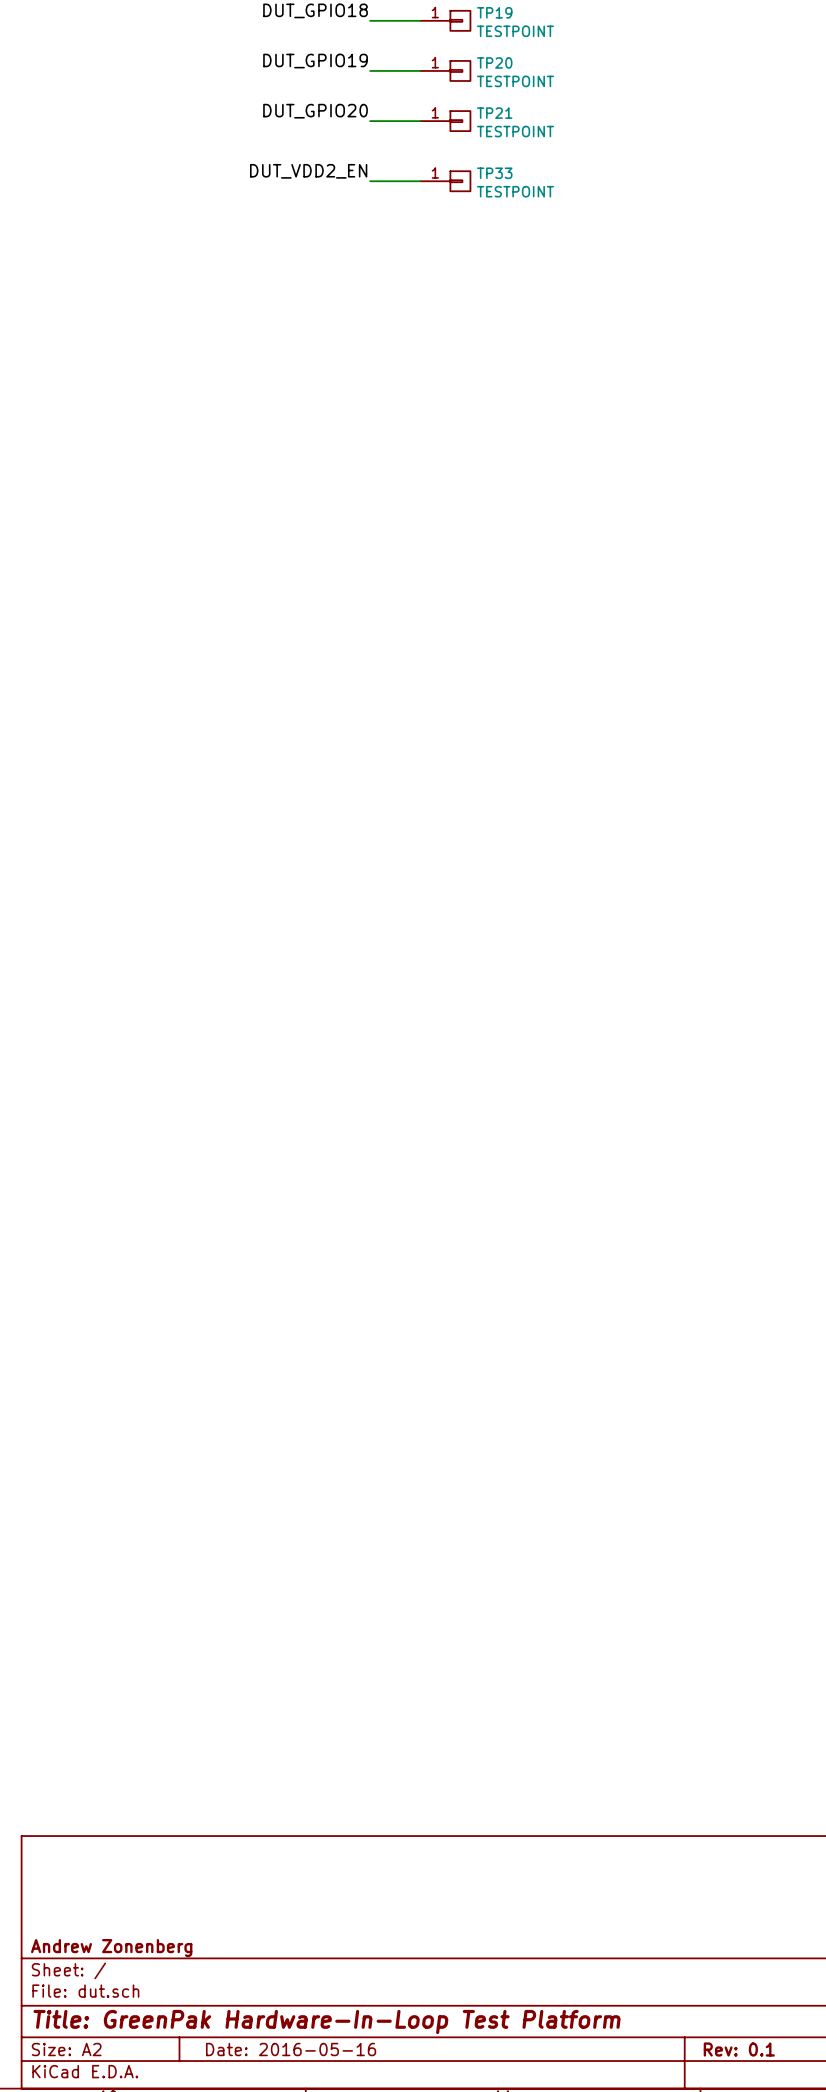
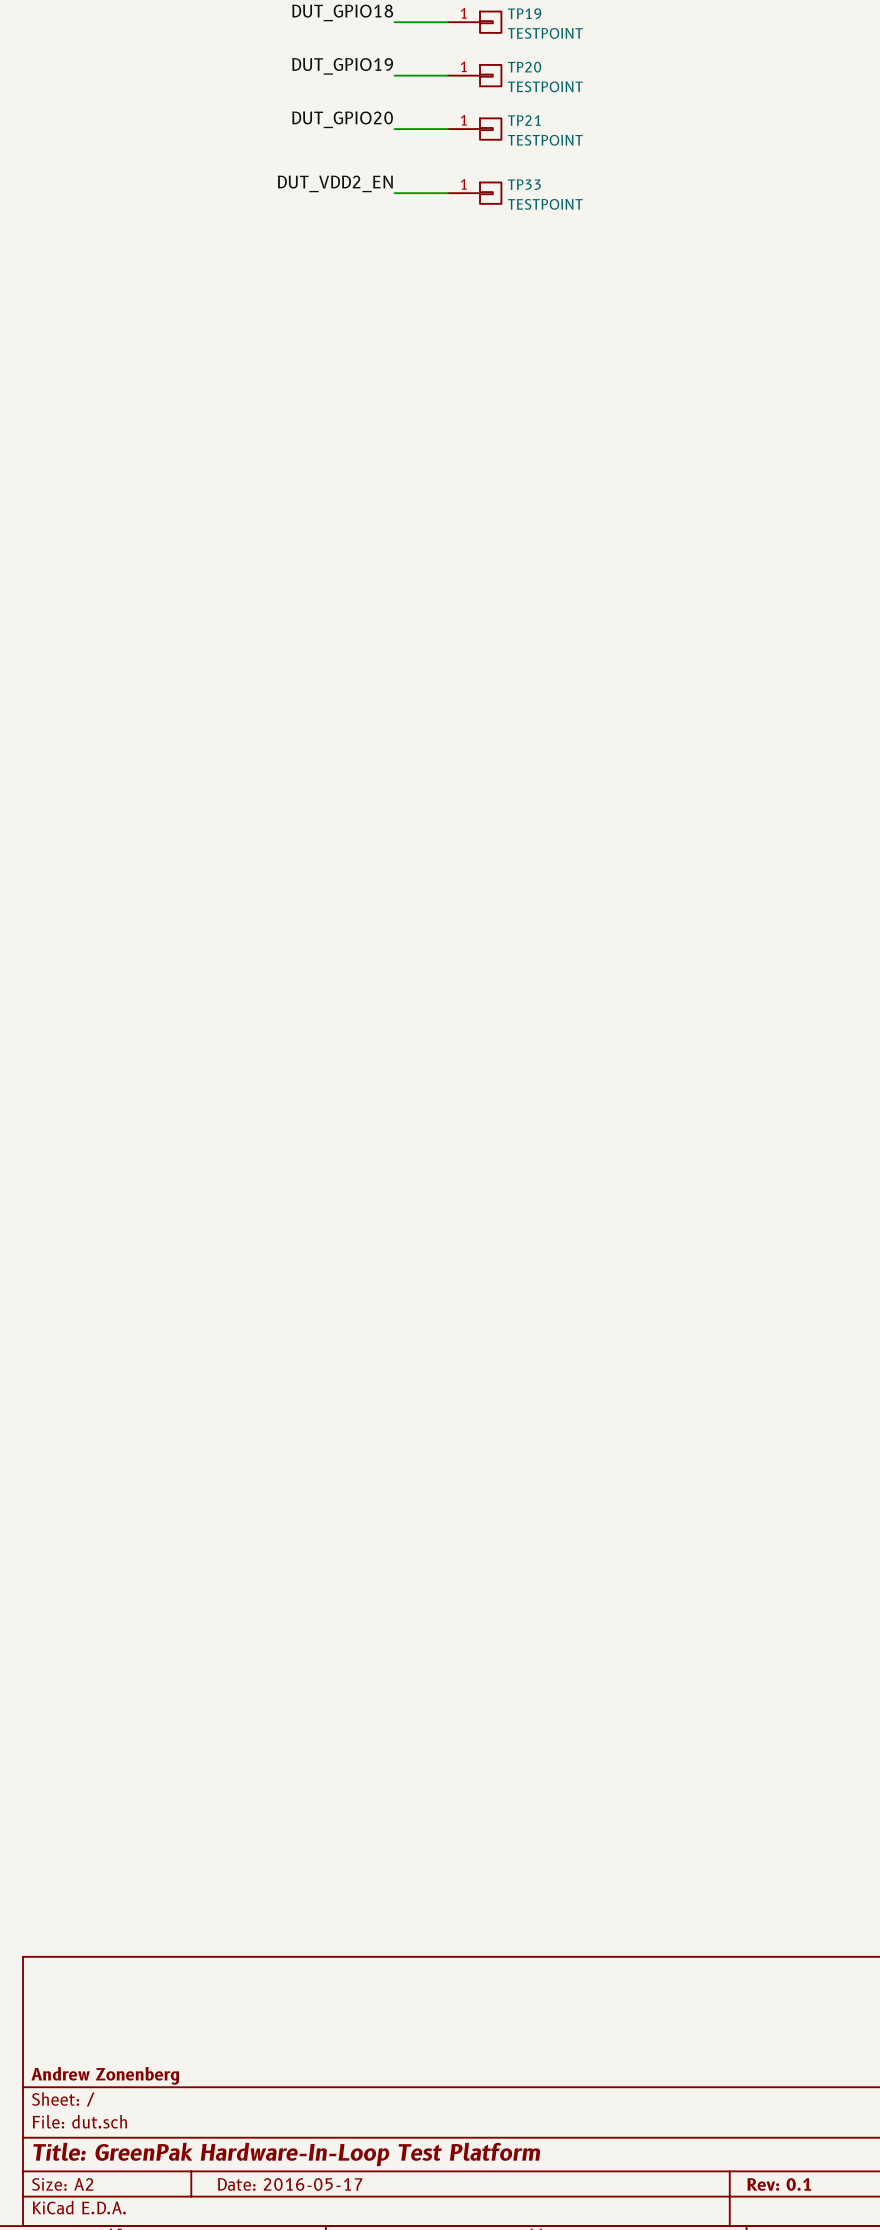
title block: Date: 2016-05-16 (291, 2049) -> Date: 2016-05-17 (290, 2184)

